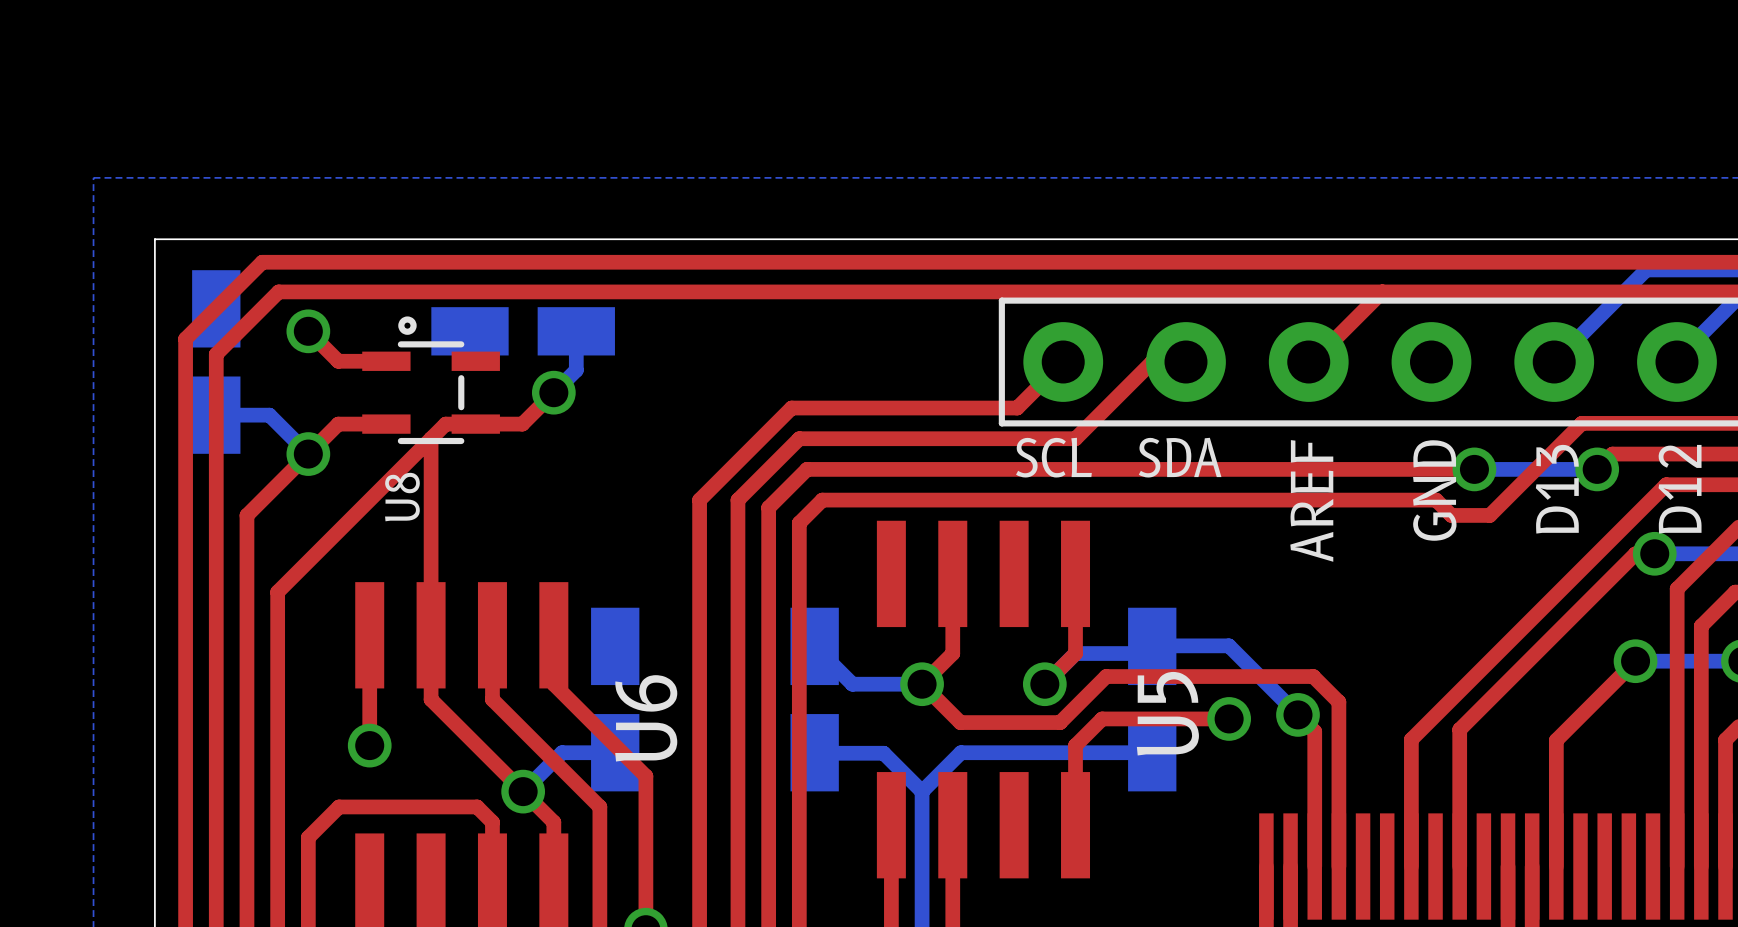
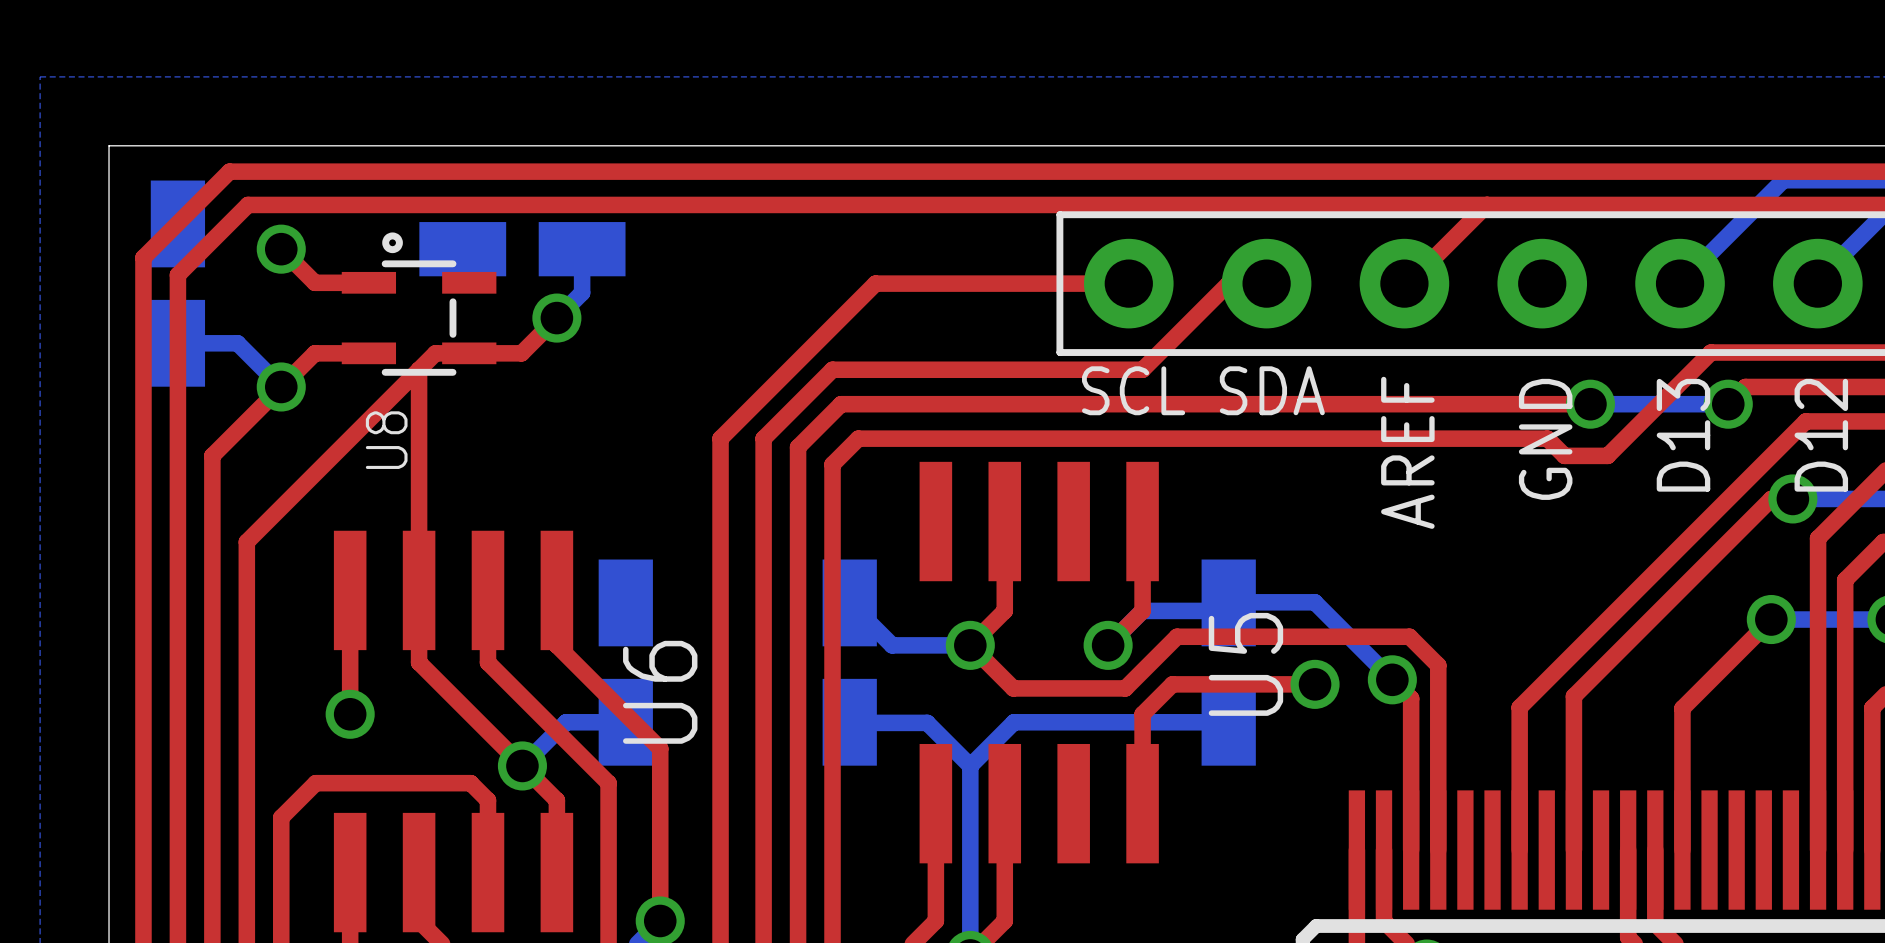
top track: (1063, 362) (1017, 408) (791, 408) -> (1128, 283) (875, 283) (823, 335)

